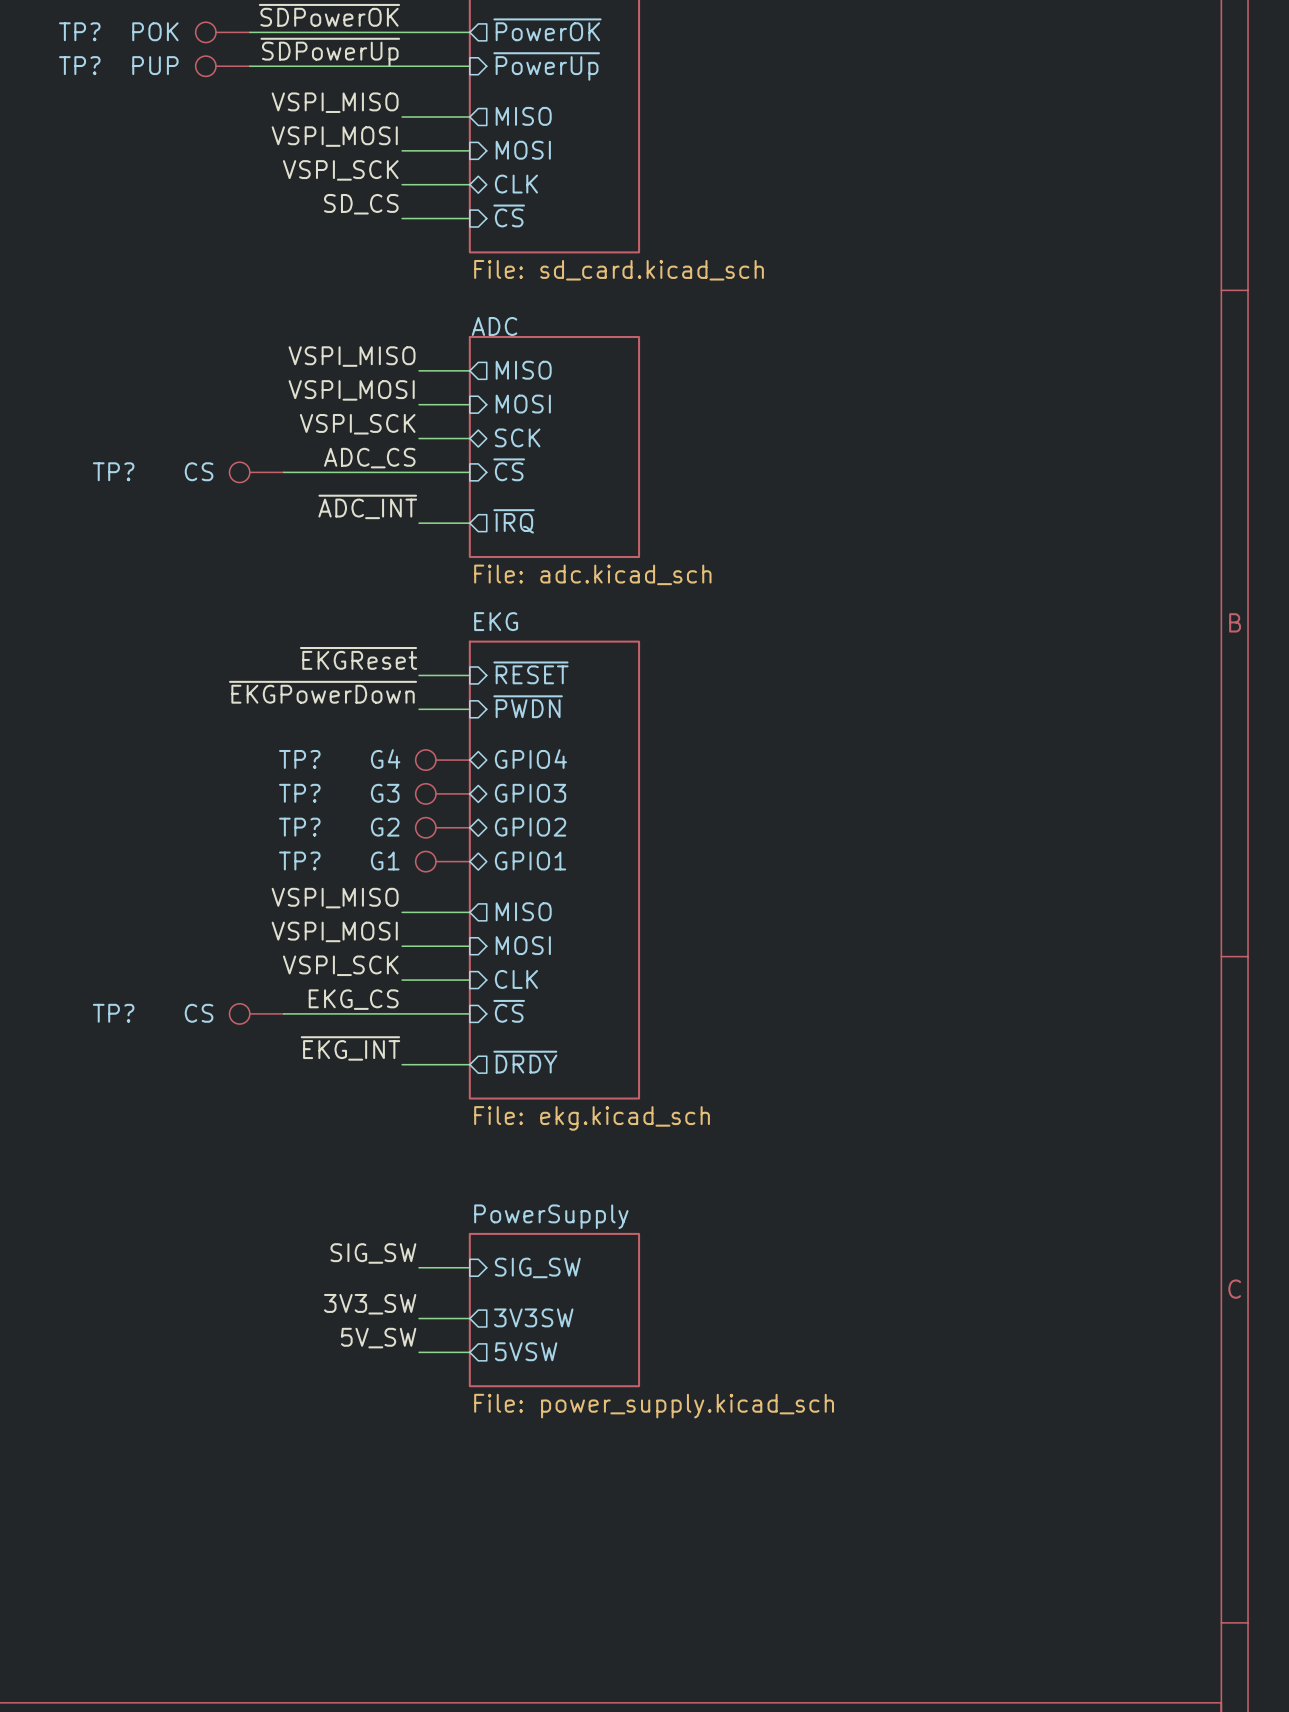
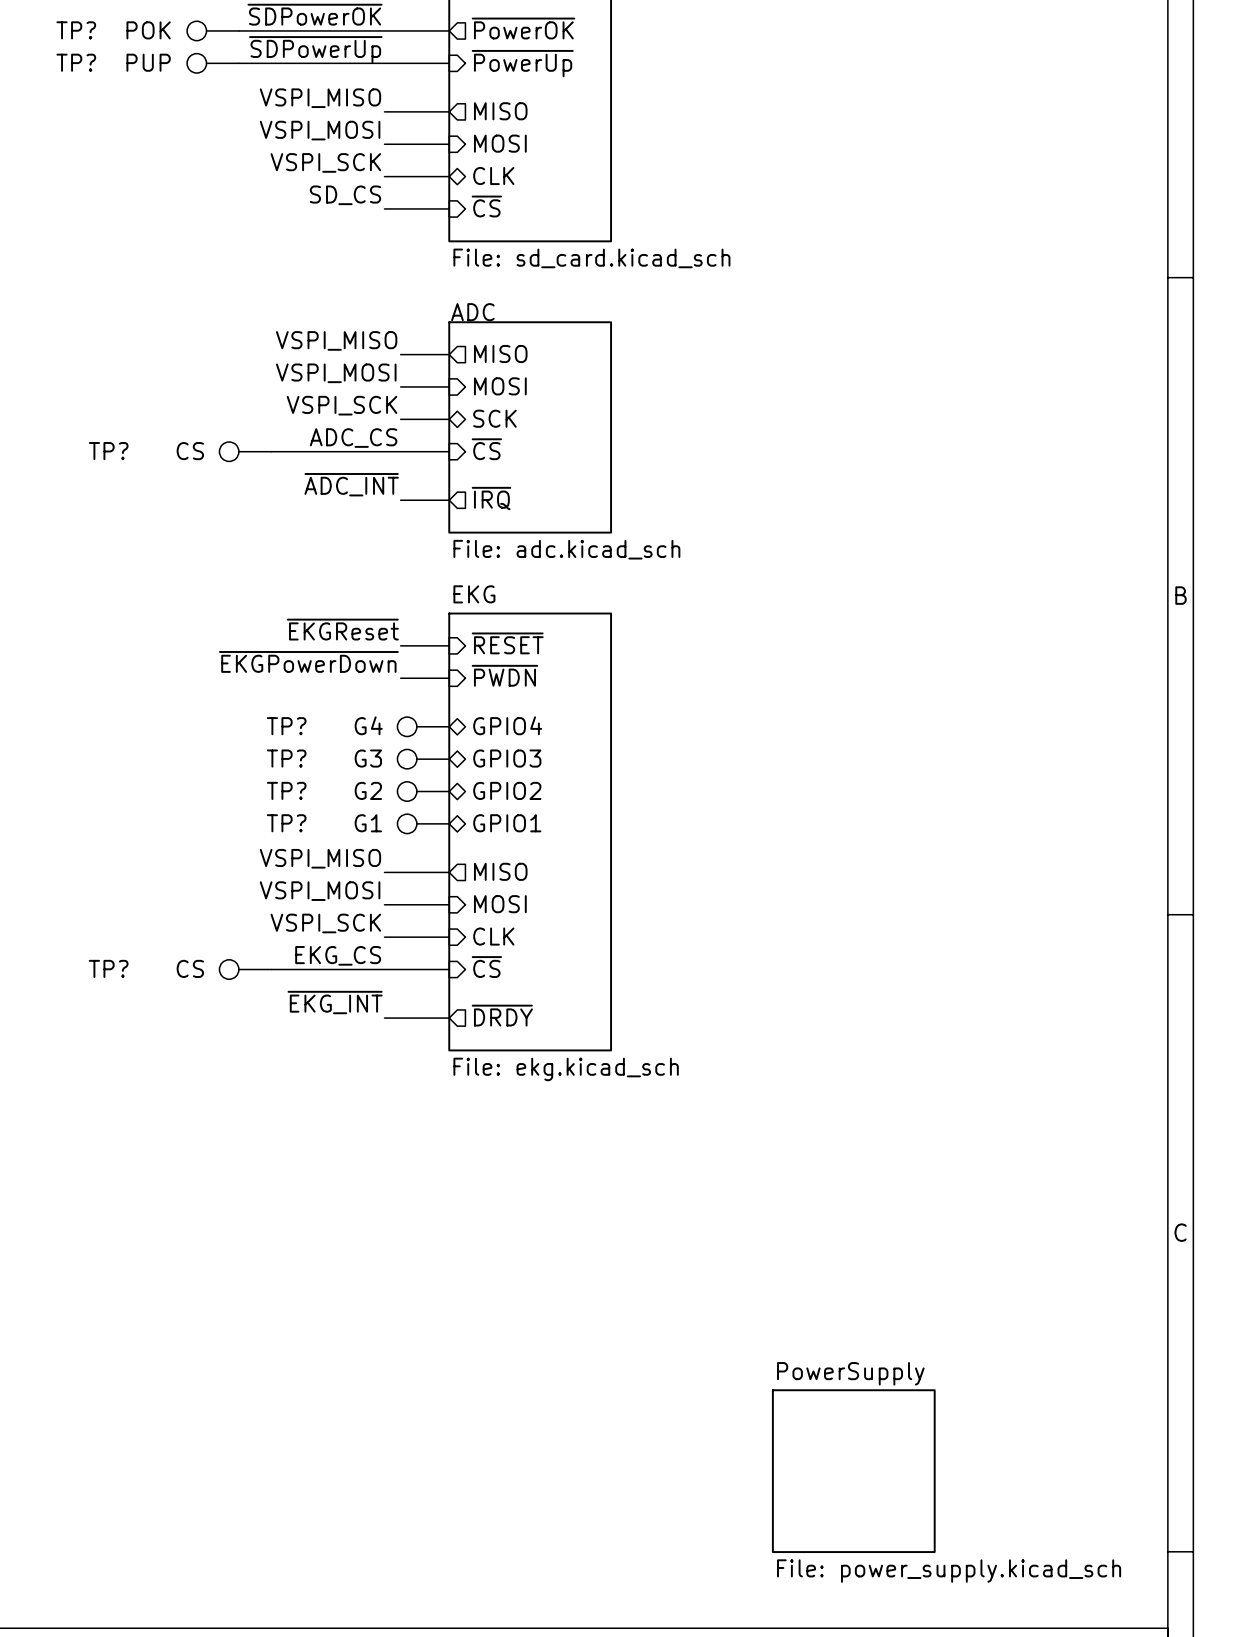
label: SIG_SW (373, 1253) -> none
wire: (419, 1267) (469, 1267) -> none
sheet pin: SIG_SW (537, 1267) -> none
label: 3V3_SW (370, 1304) -> none
sheet PowerSupply: File: power_supply.kicad_sch (554, 1310) -> none
sheet pin: 3V3SW (533, 1317) -> none
wire: (419, 1318) (469, 1318) -> none
label: 5V_SW (378, 1338) -> none
sheet pin: 5VSW (526, 1351) -> none
wire: (419, 1352) (469, 1352) -> none
sheet PowerSupply: none -> File: power_supply.kicad_sch (853, 1471)

